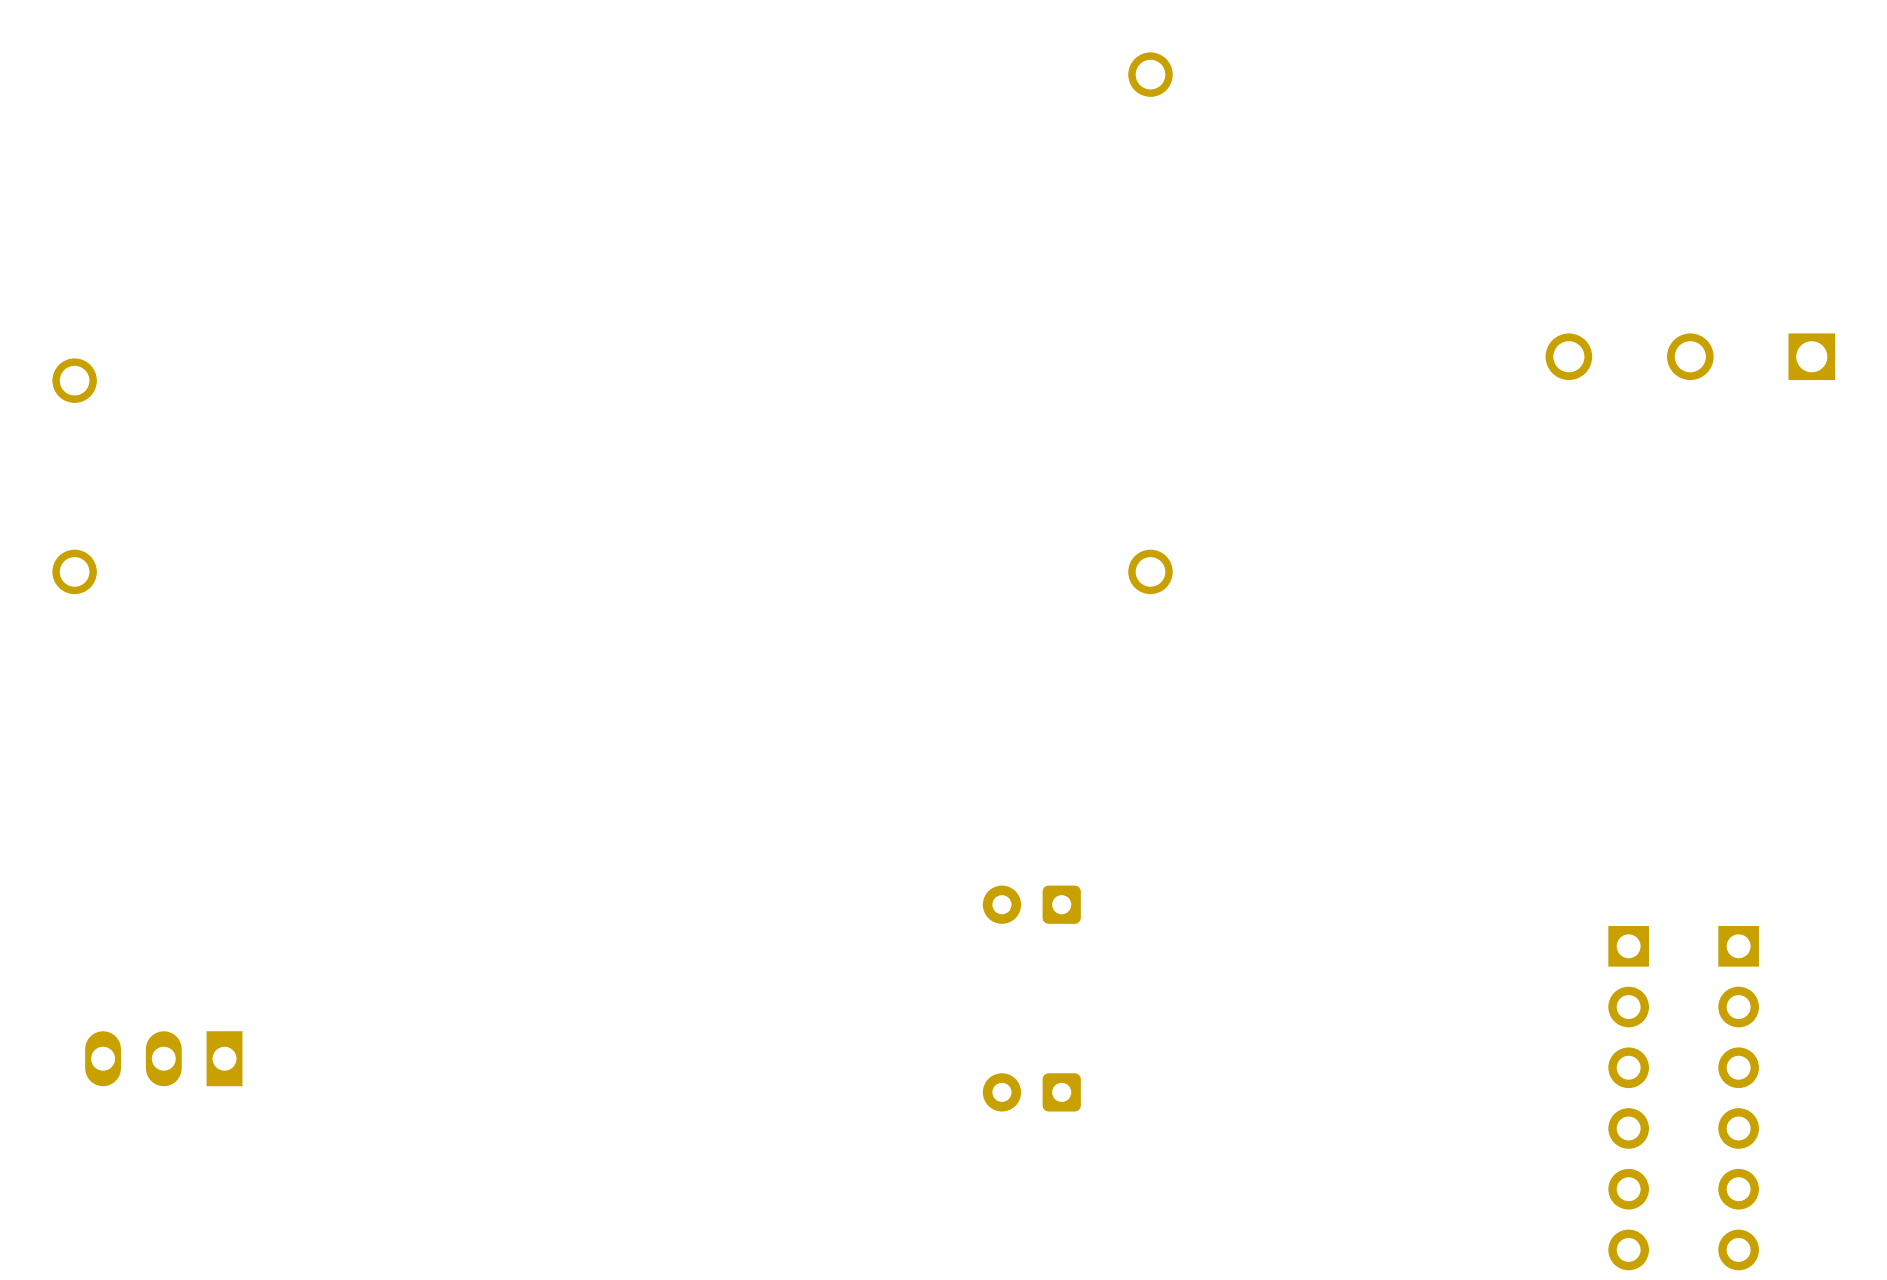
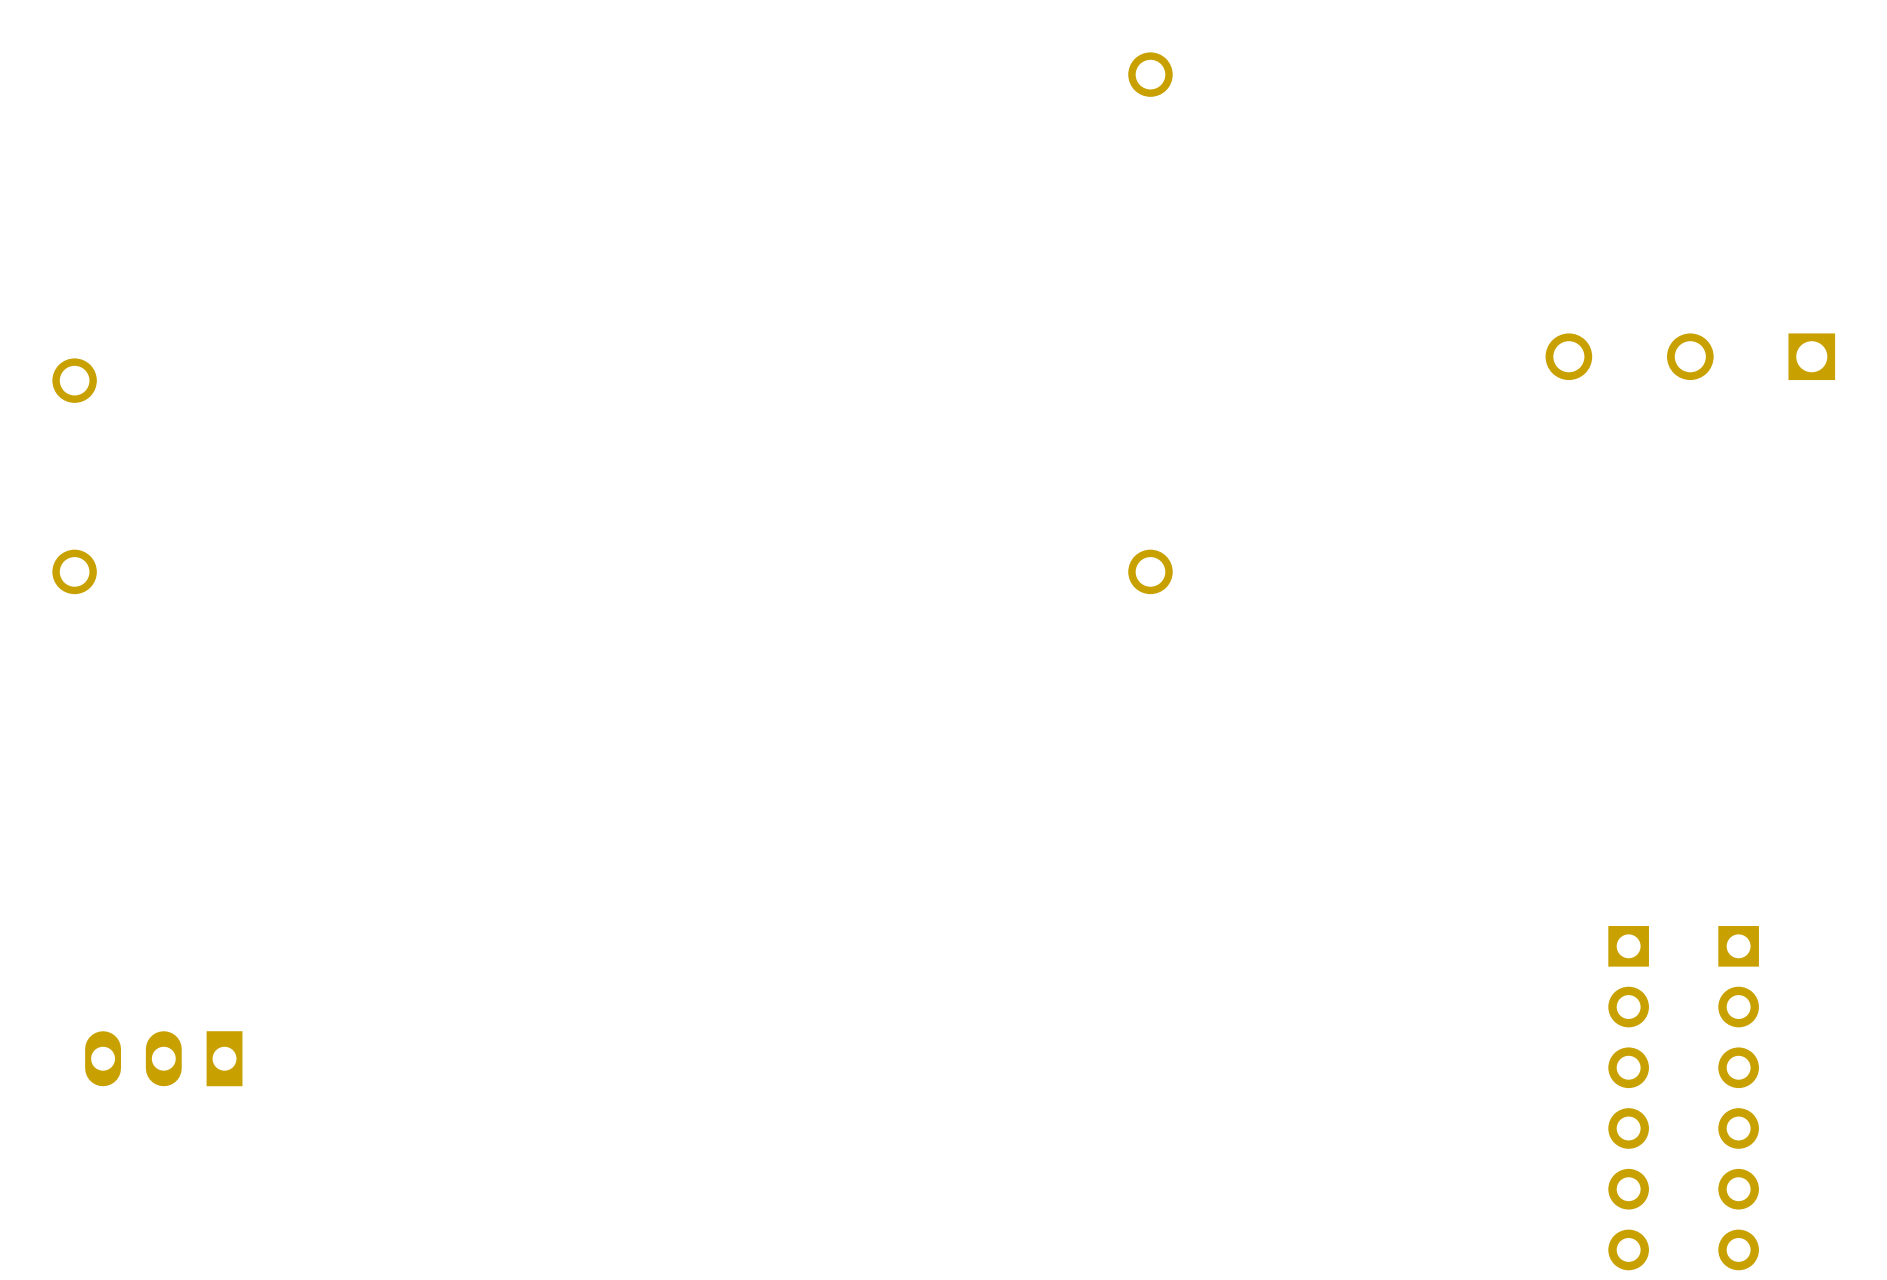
part: (1031, 904) -> none
part: (1031, 1092) -> none

